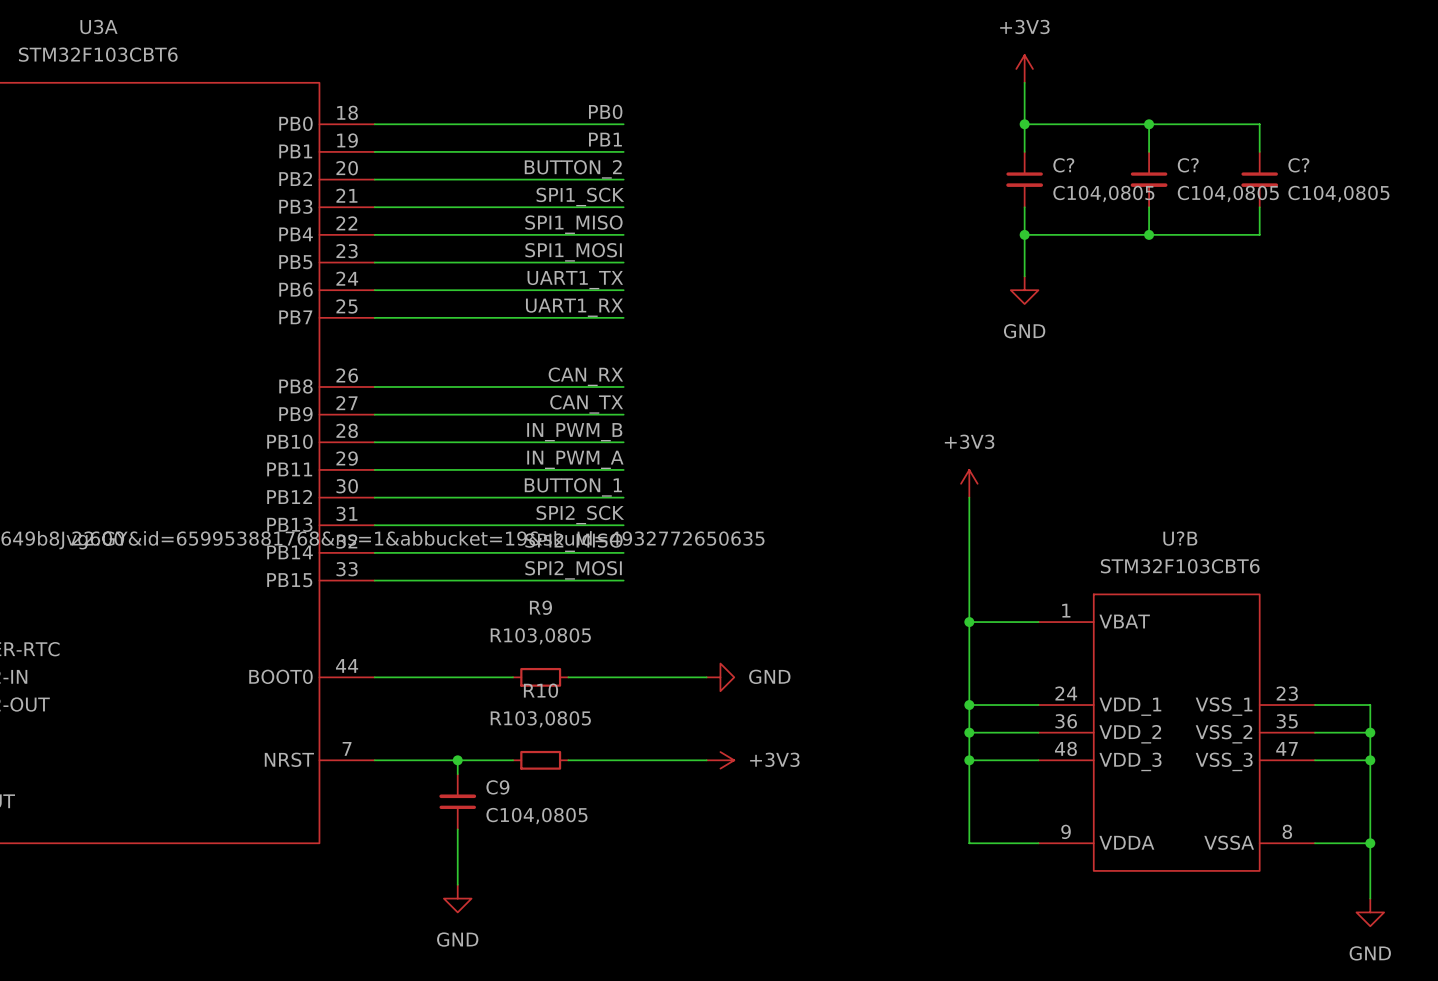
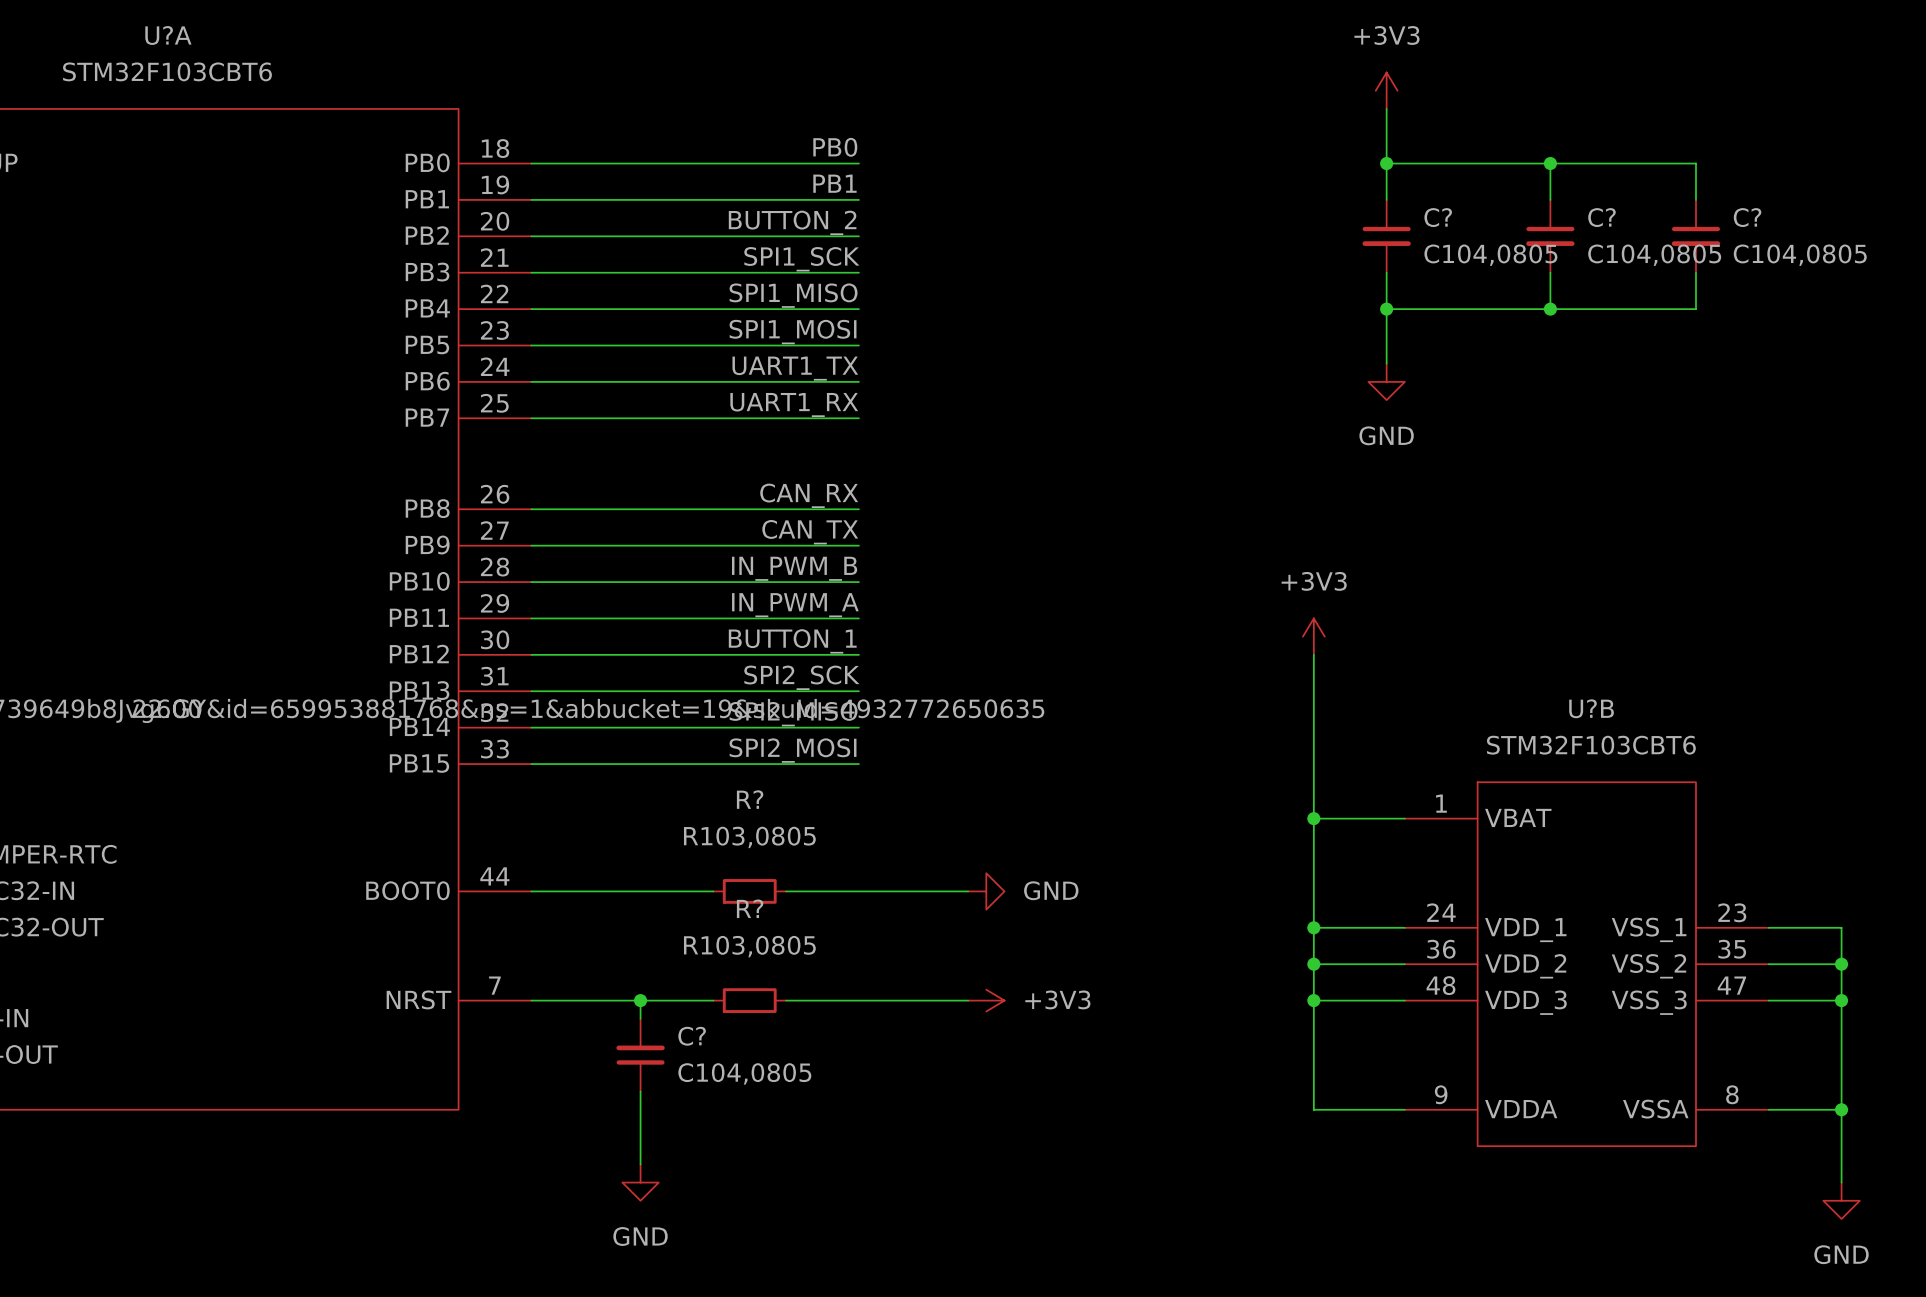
U3A name: U3A (98, 26) -> U?A (168, 35)
R9 name: R9 (540, 607) -> R? (750, 799)
R10 name: R10 (540, 690) -> R? (750, 908)
C9 name: C9 (497, 787) -> C? (692, 1036)

